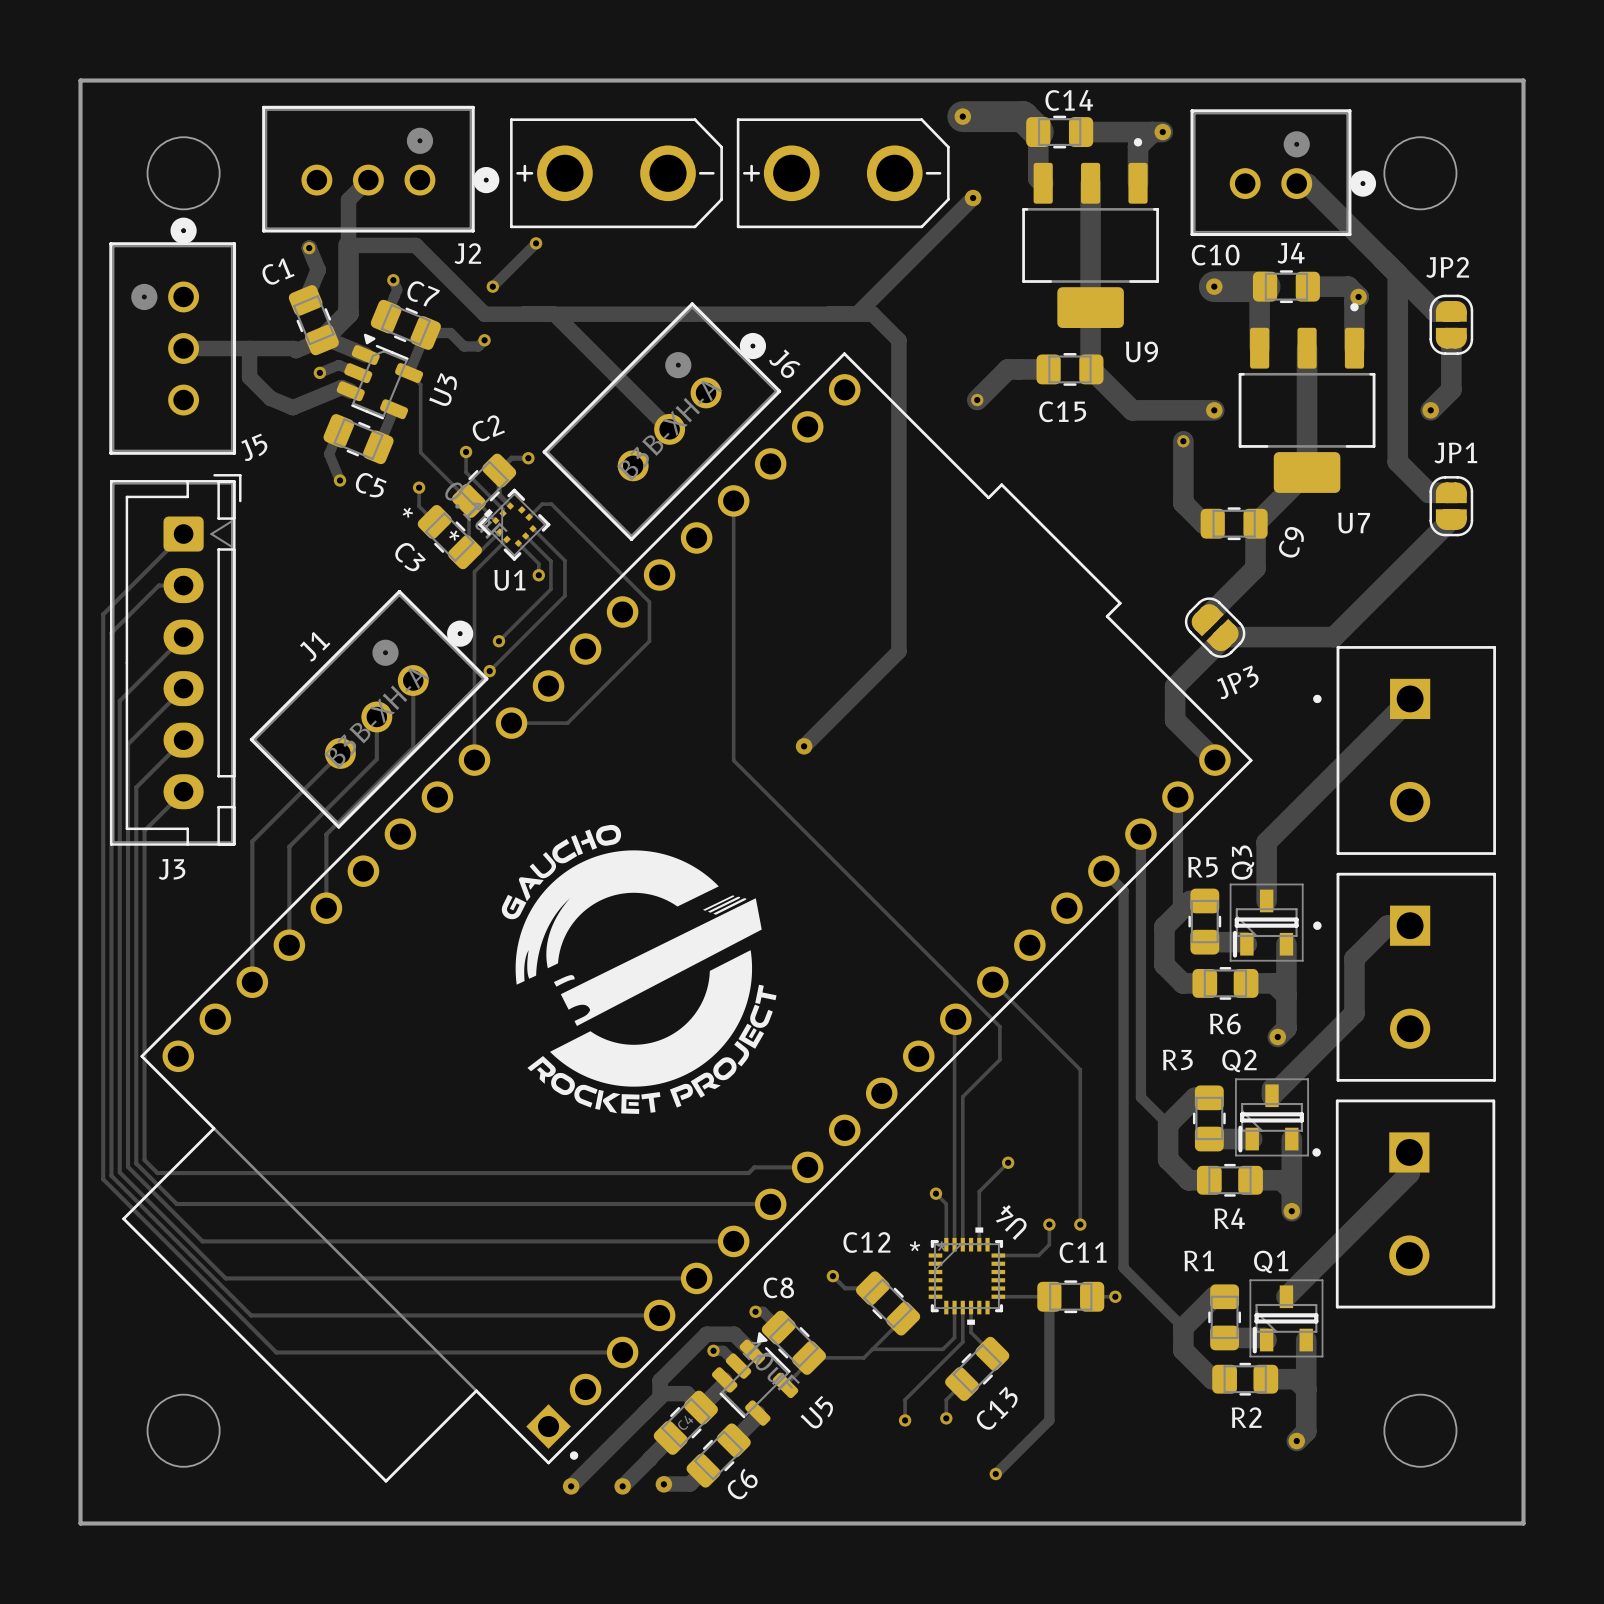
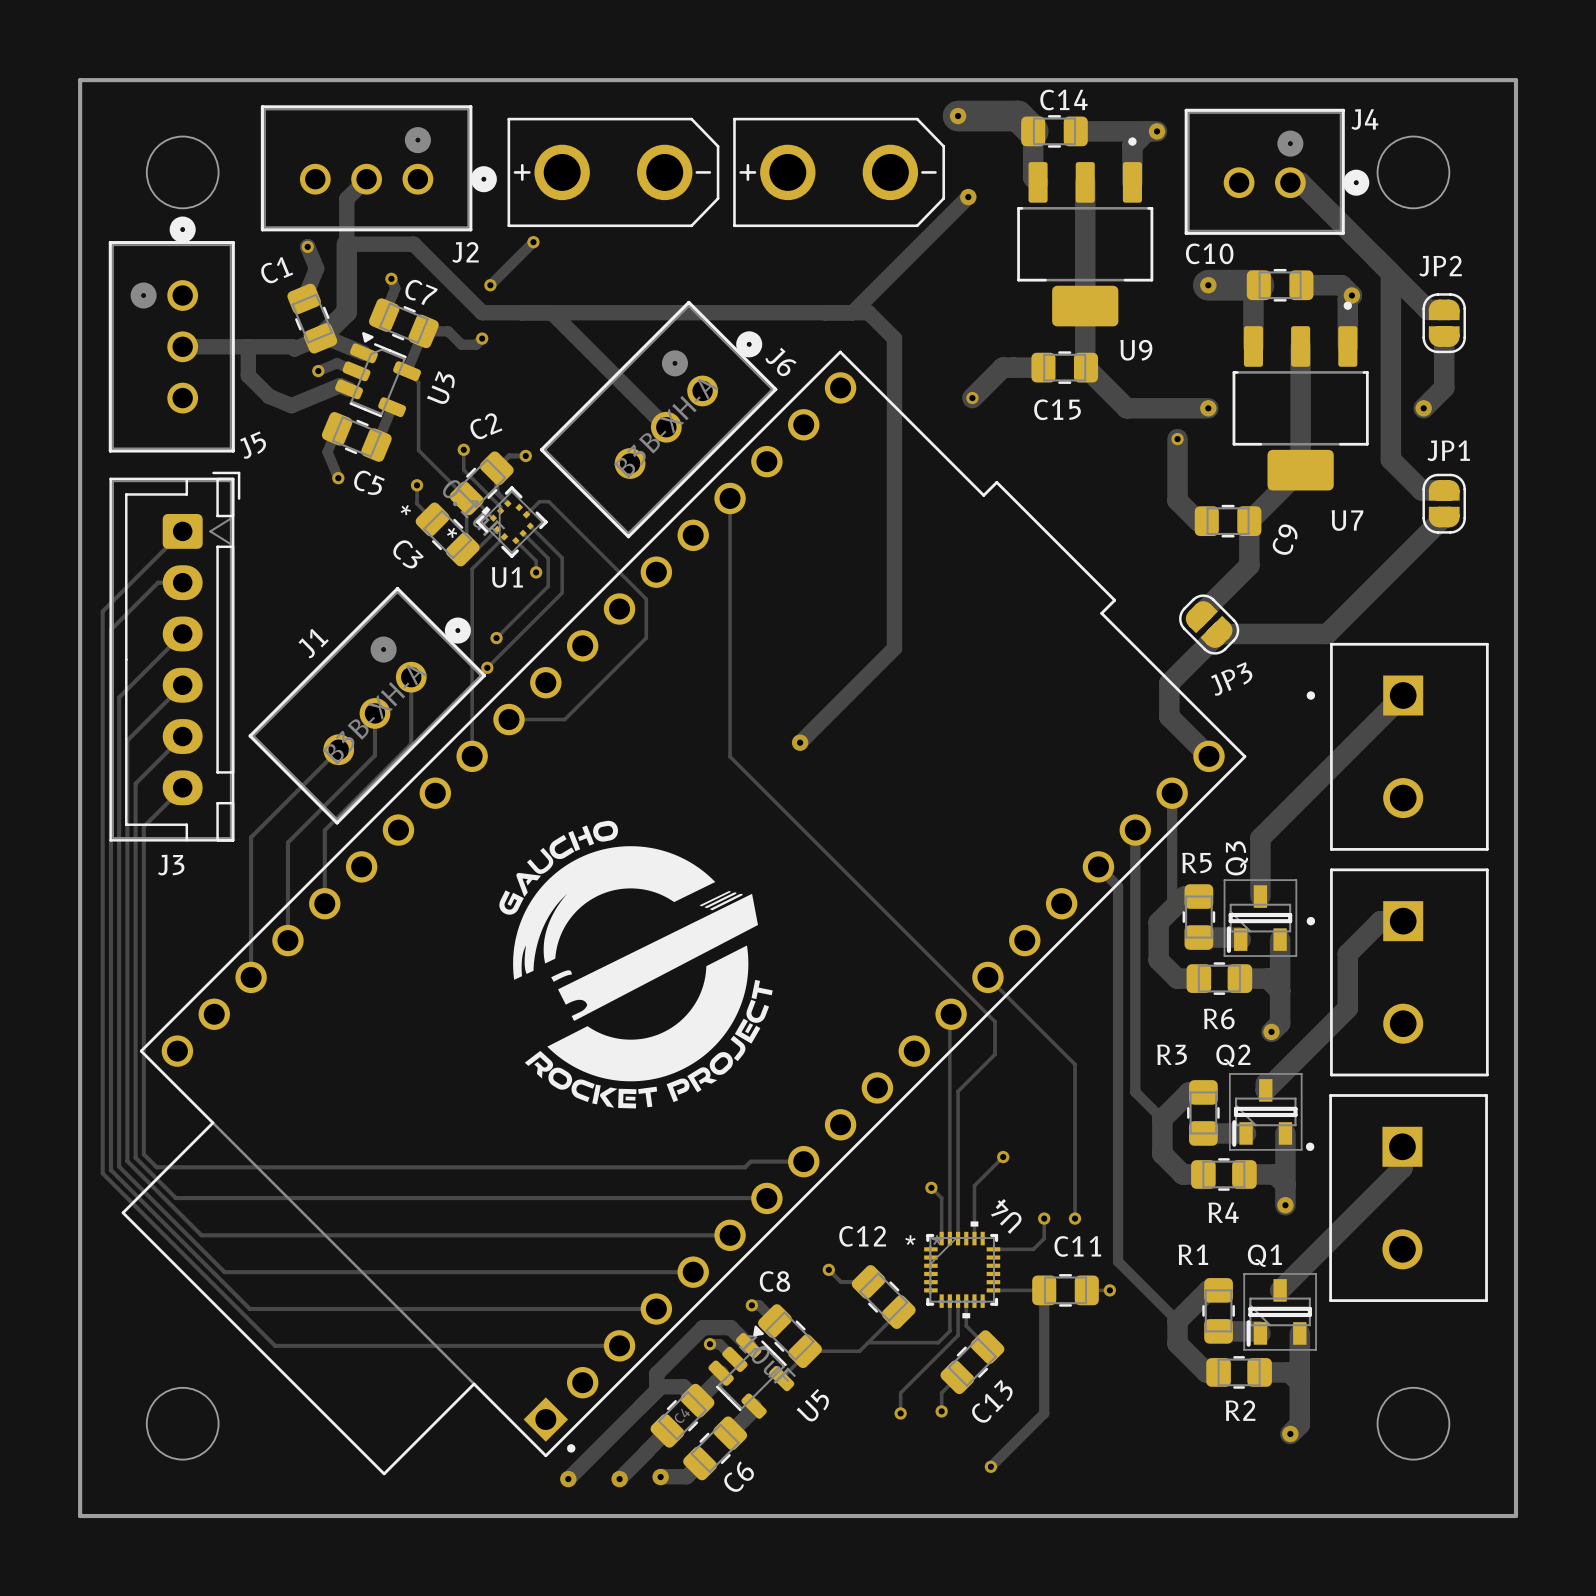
J4 name position: J4 (1291, 253) -> J4 (1364, 119)

